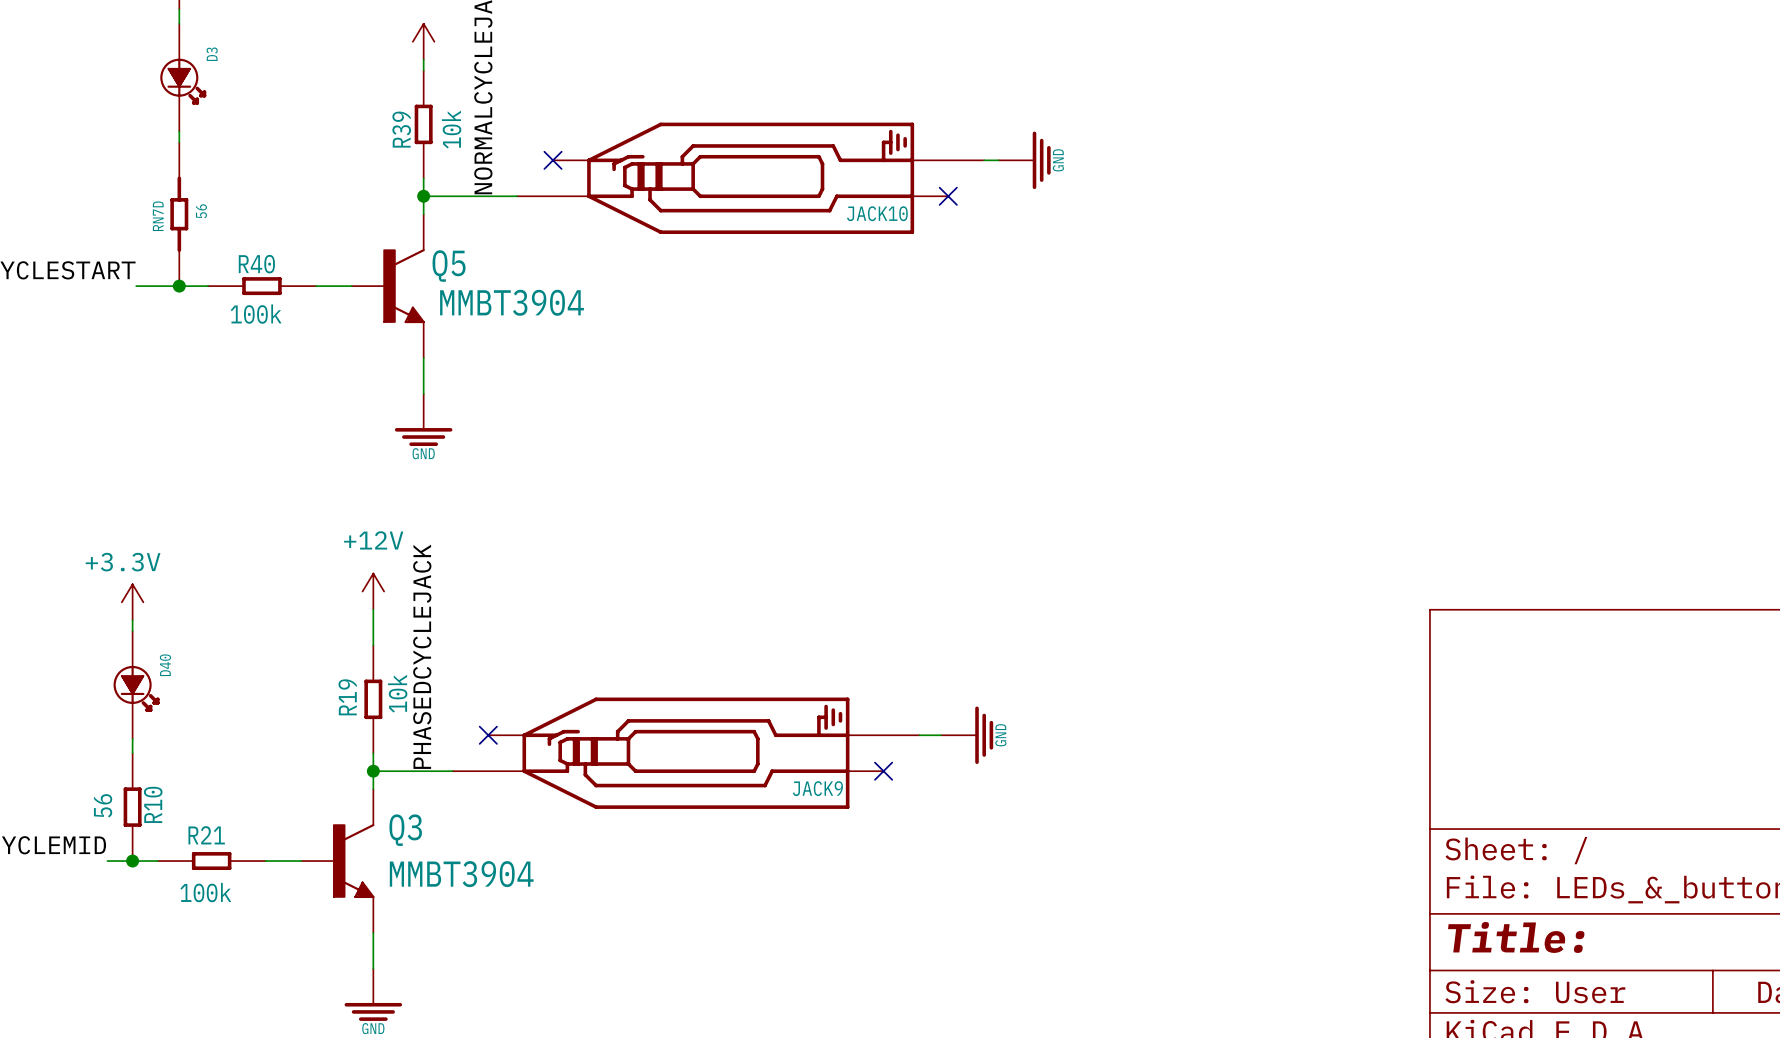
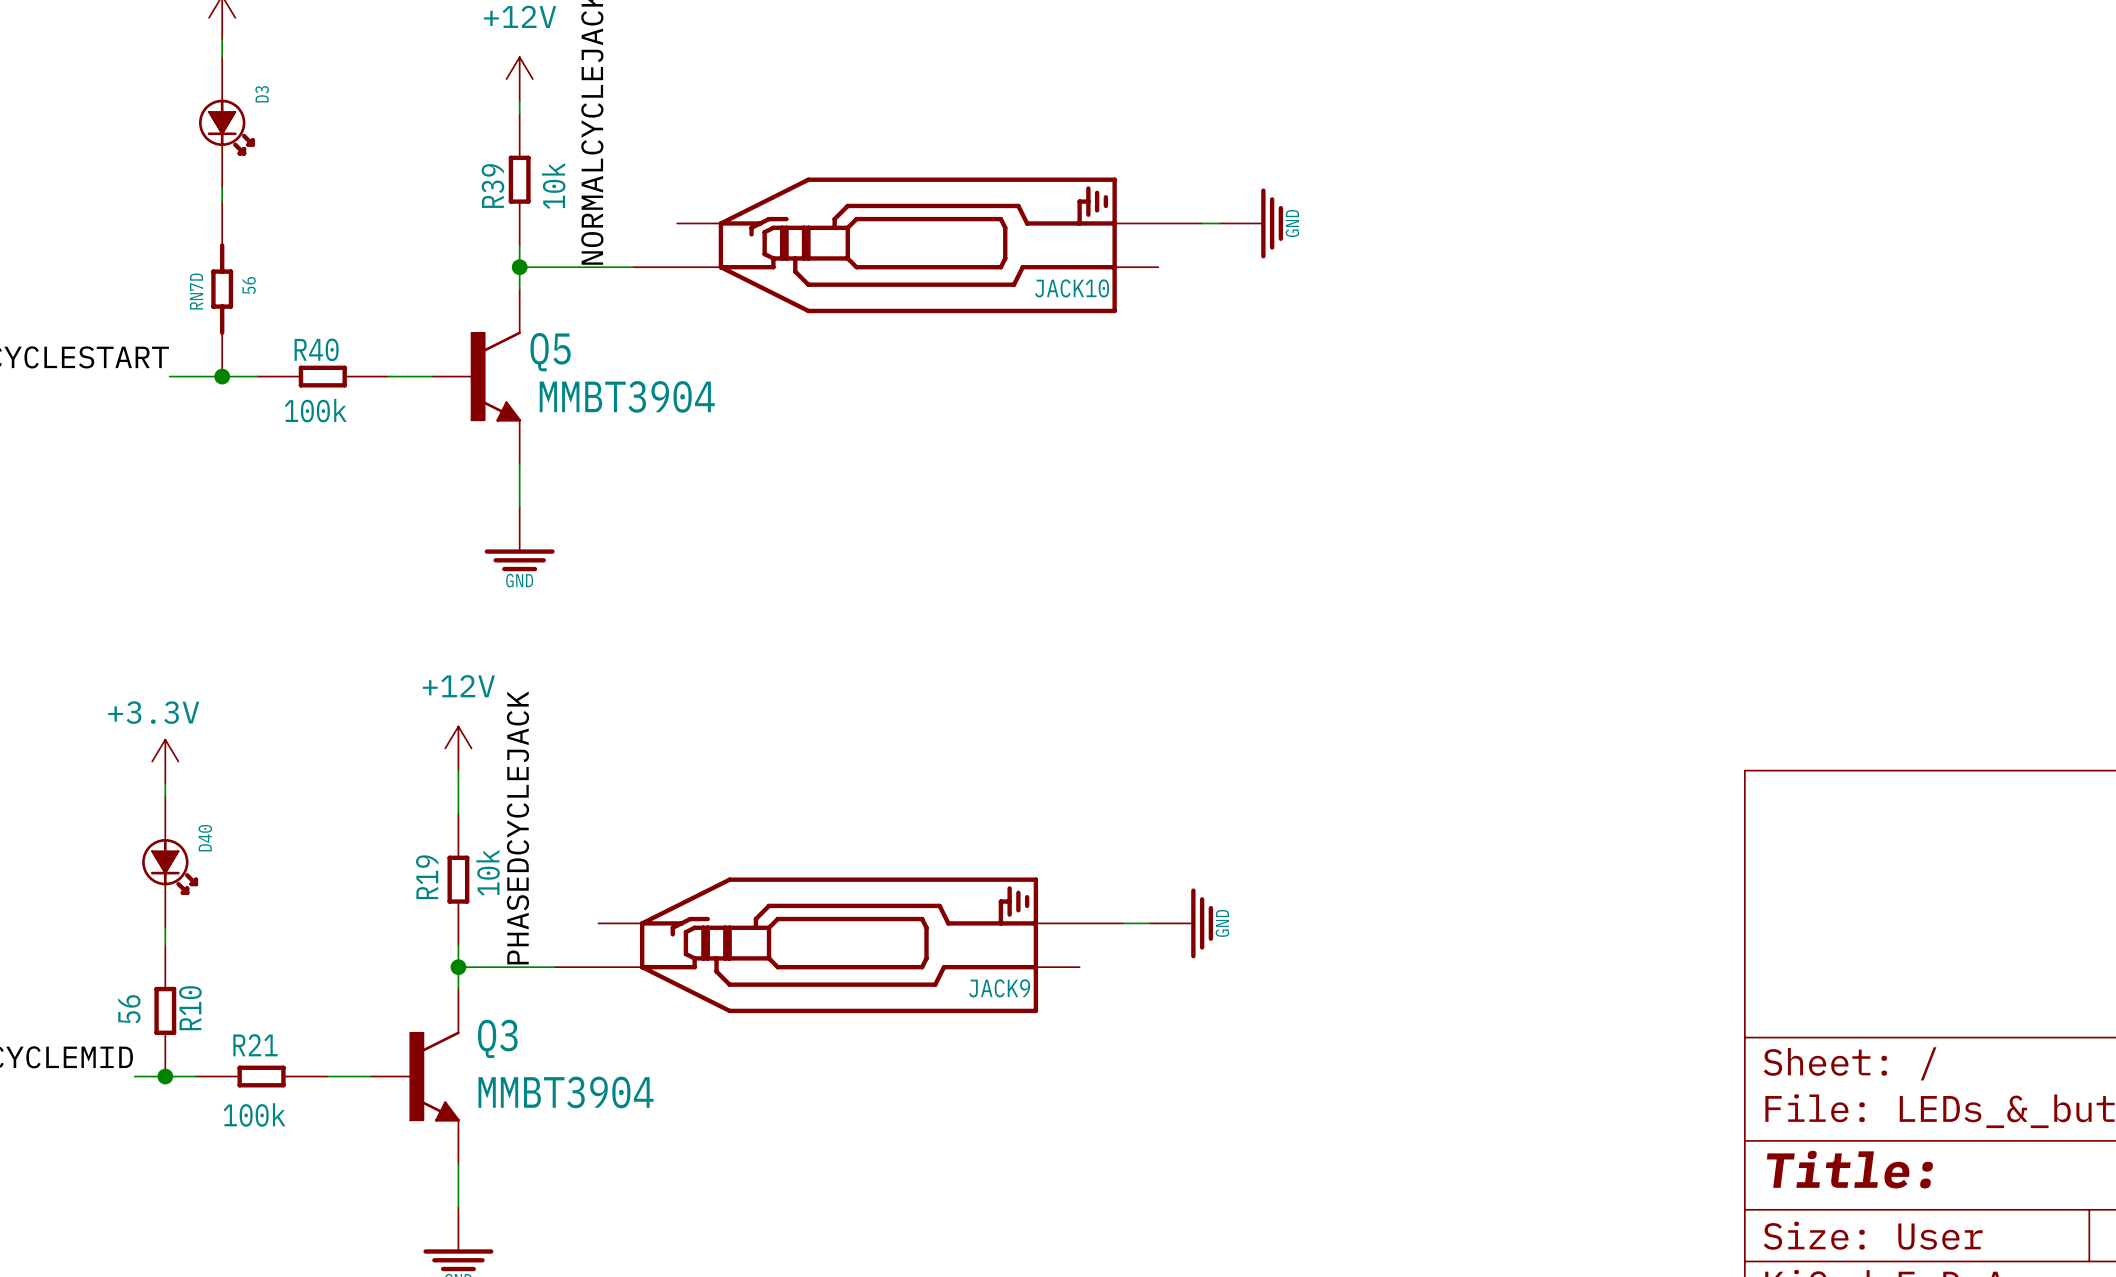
no-connect mark: (553, 160) -> none
no-connect mark: (948, 196) -> none
no-connect mark: (488, 735) -> none
no-connect mark: (883, 771) -> none

